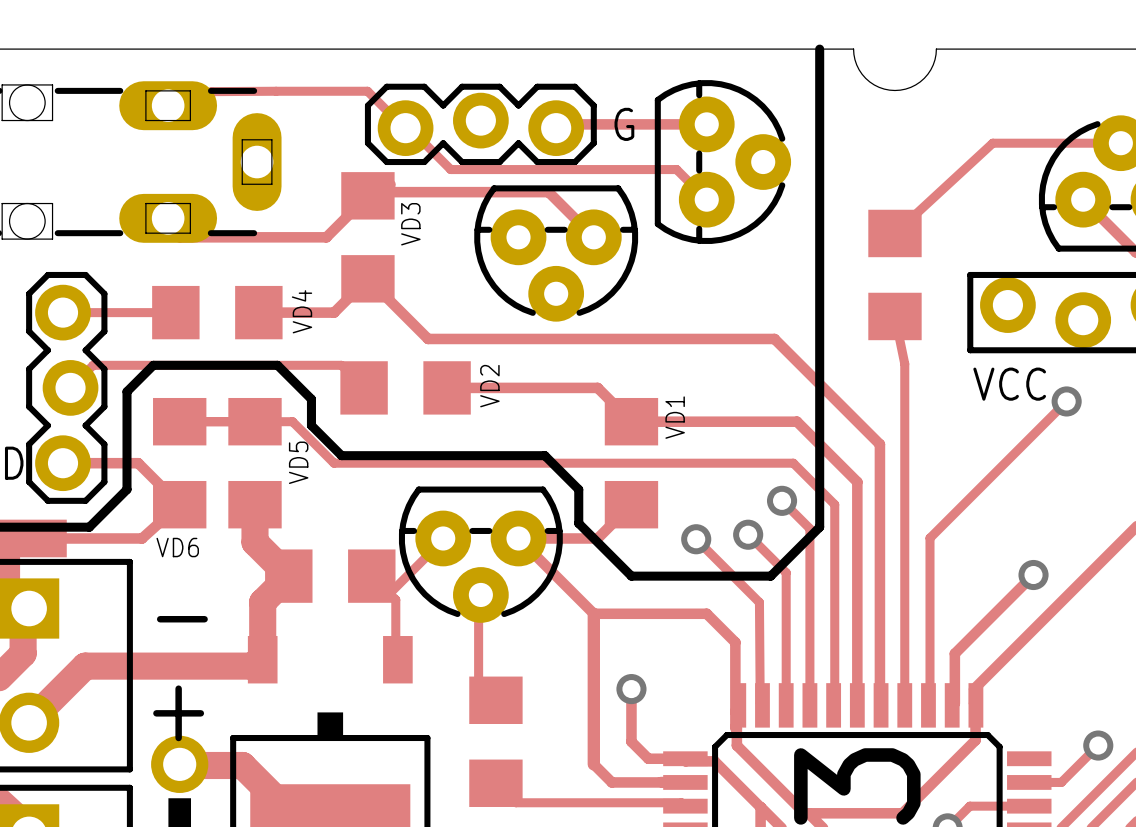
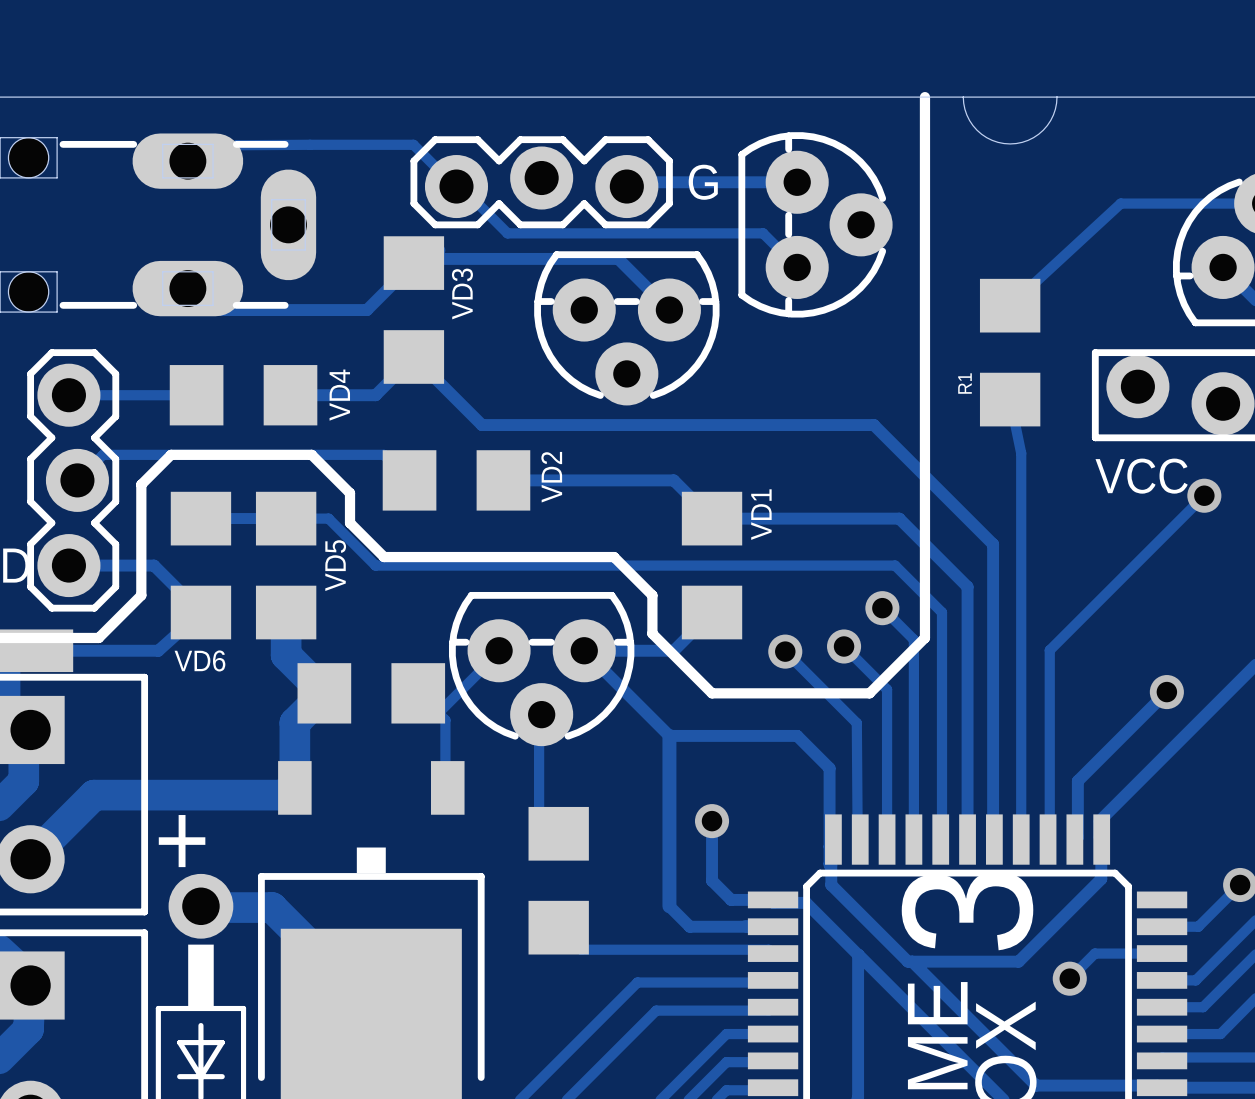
board edge: none -> (963, 97) (1056, 97)
R1 name: none -> R1 (965, 383)
text: - (182, 619) -> none

